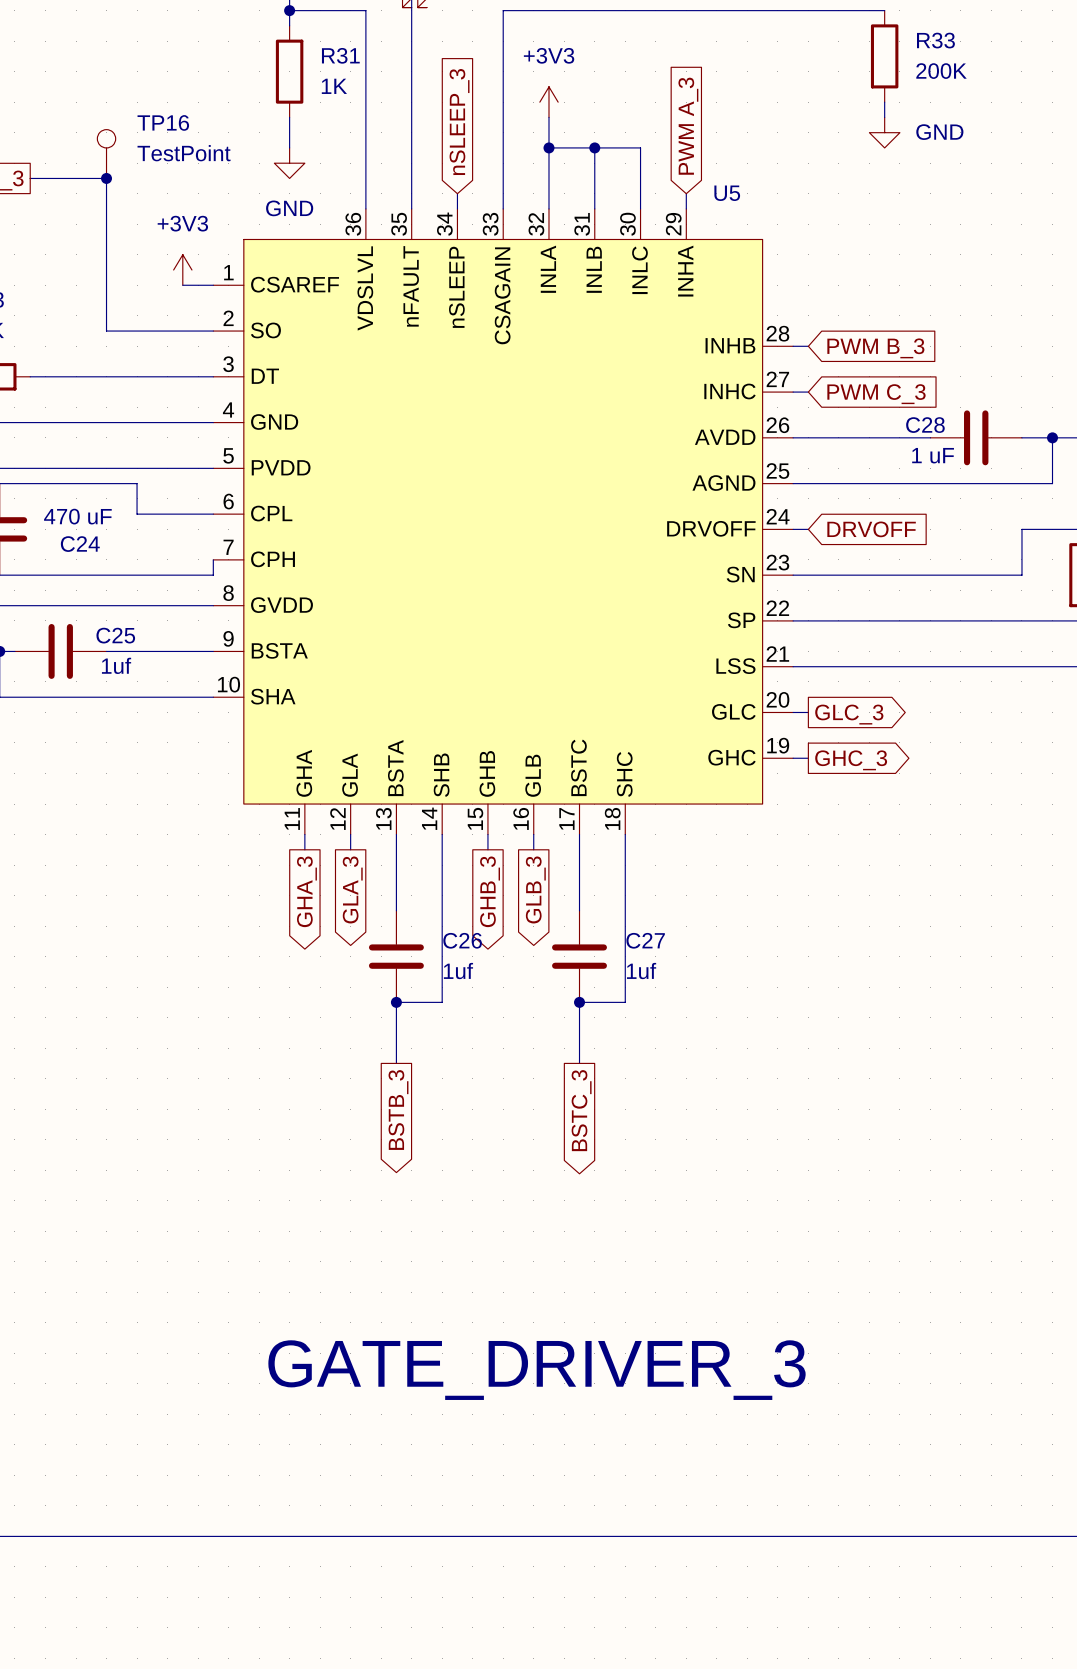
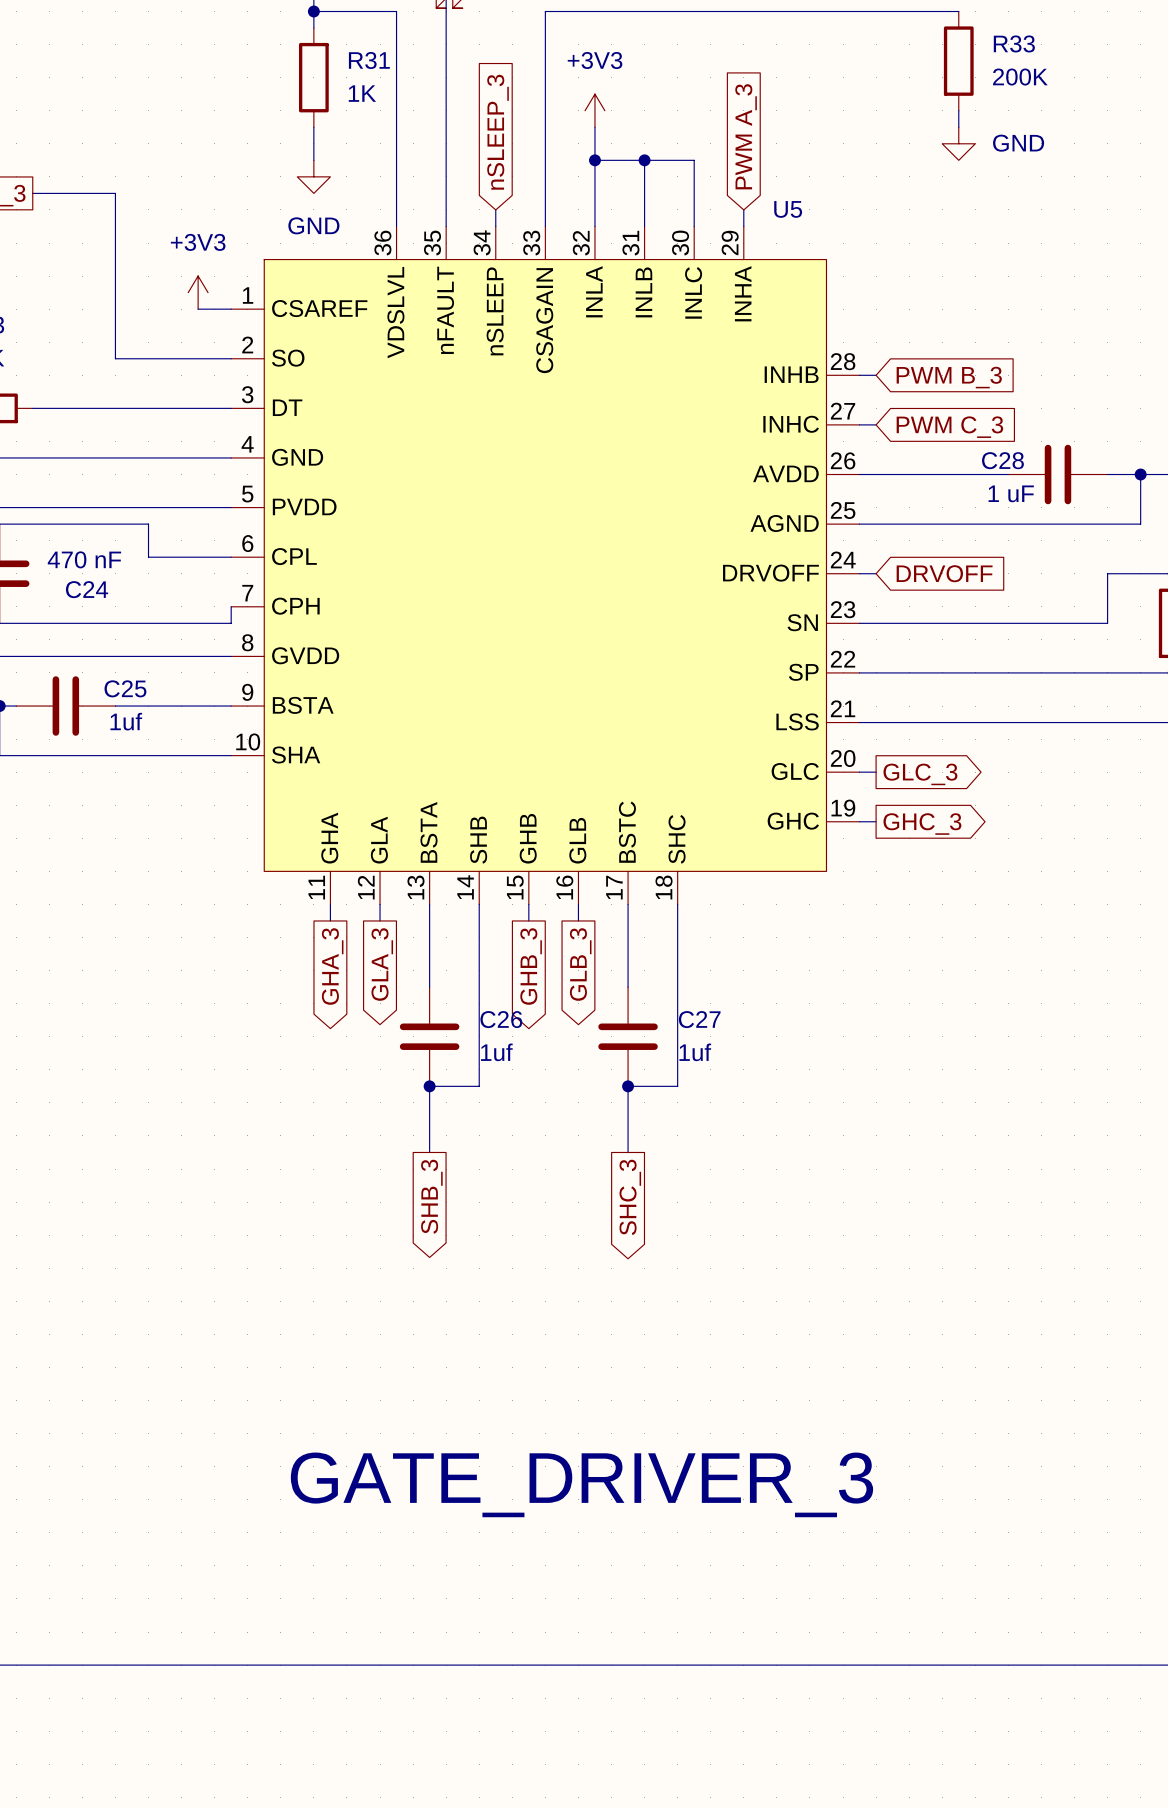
TP16: TestPoint (106, 154) -> none
junction: (106, 178) -> none
C24 value: 470 uF (77, 516) -> 470 nF (84, 559)
global label: BSTB_3 (398, 1110) -> SHB_3 (431, 1196)
global label: BSTC_3 (581, 1110) -> SHC_3 (630, 1197)

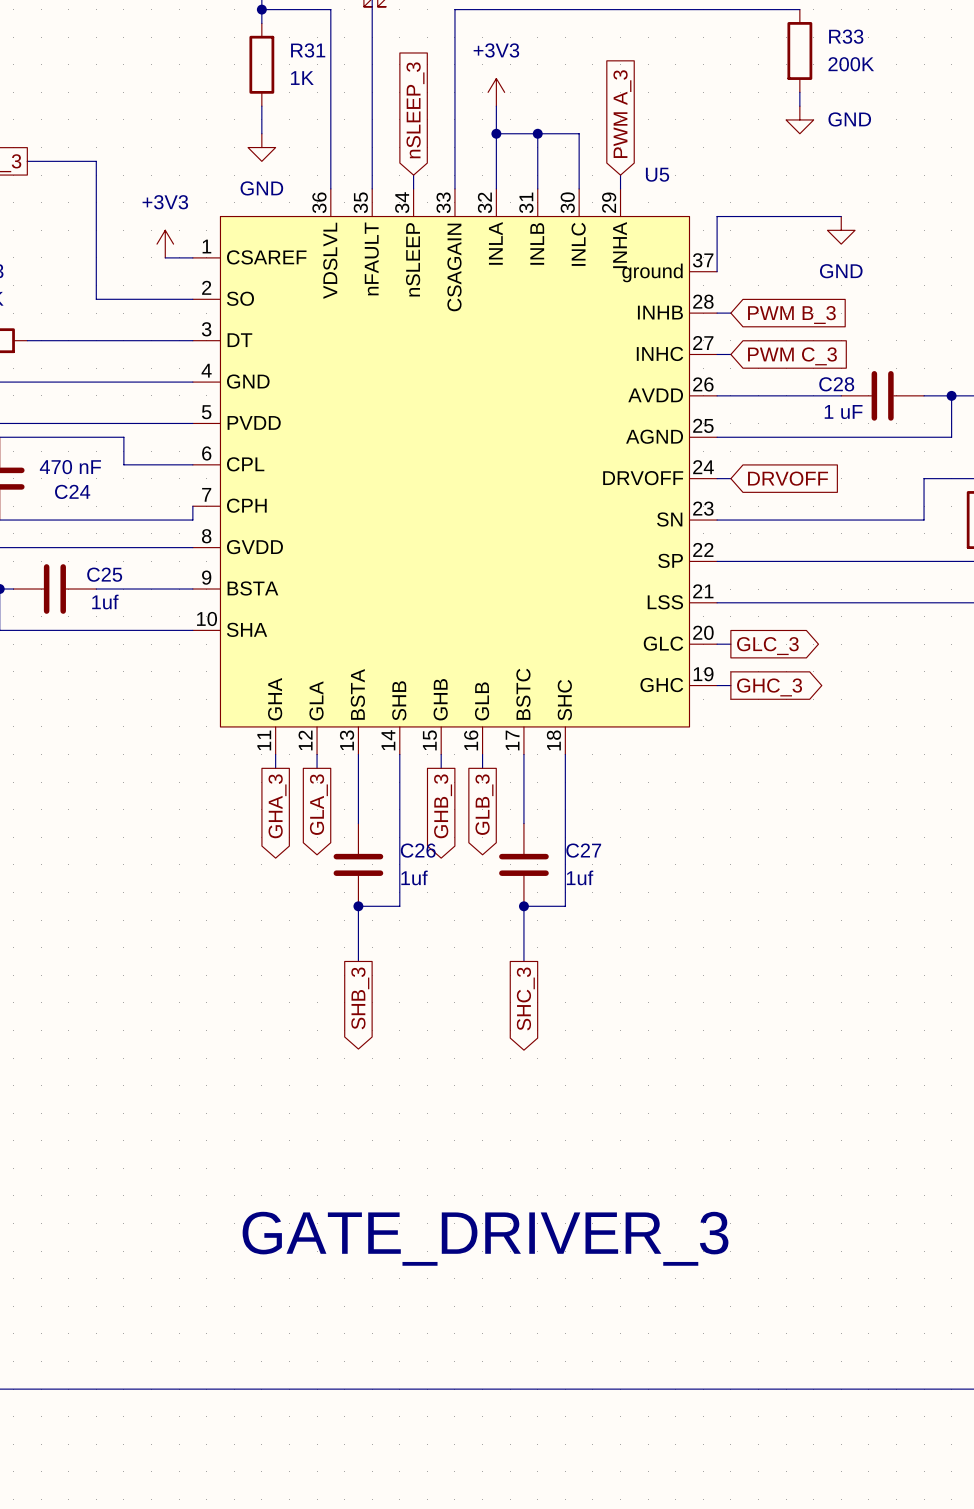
U5 symbol: [231, 226, 860, 905] -> [192, 188, 718, 755]
wire: none -> (841, 216) (717, 216) (717, 271)
power symbol: none -> GND (841, 230)

